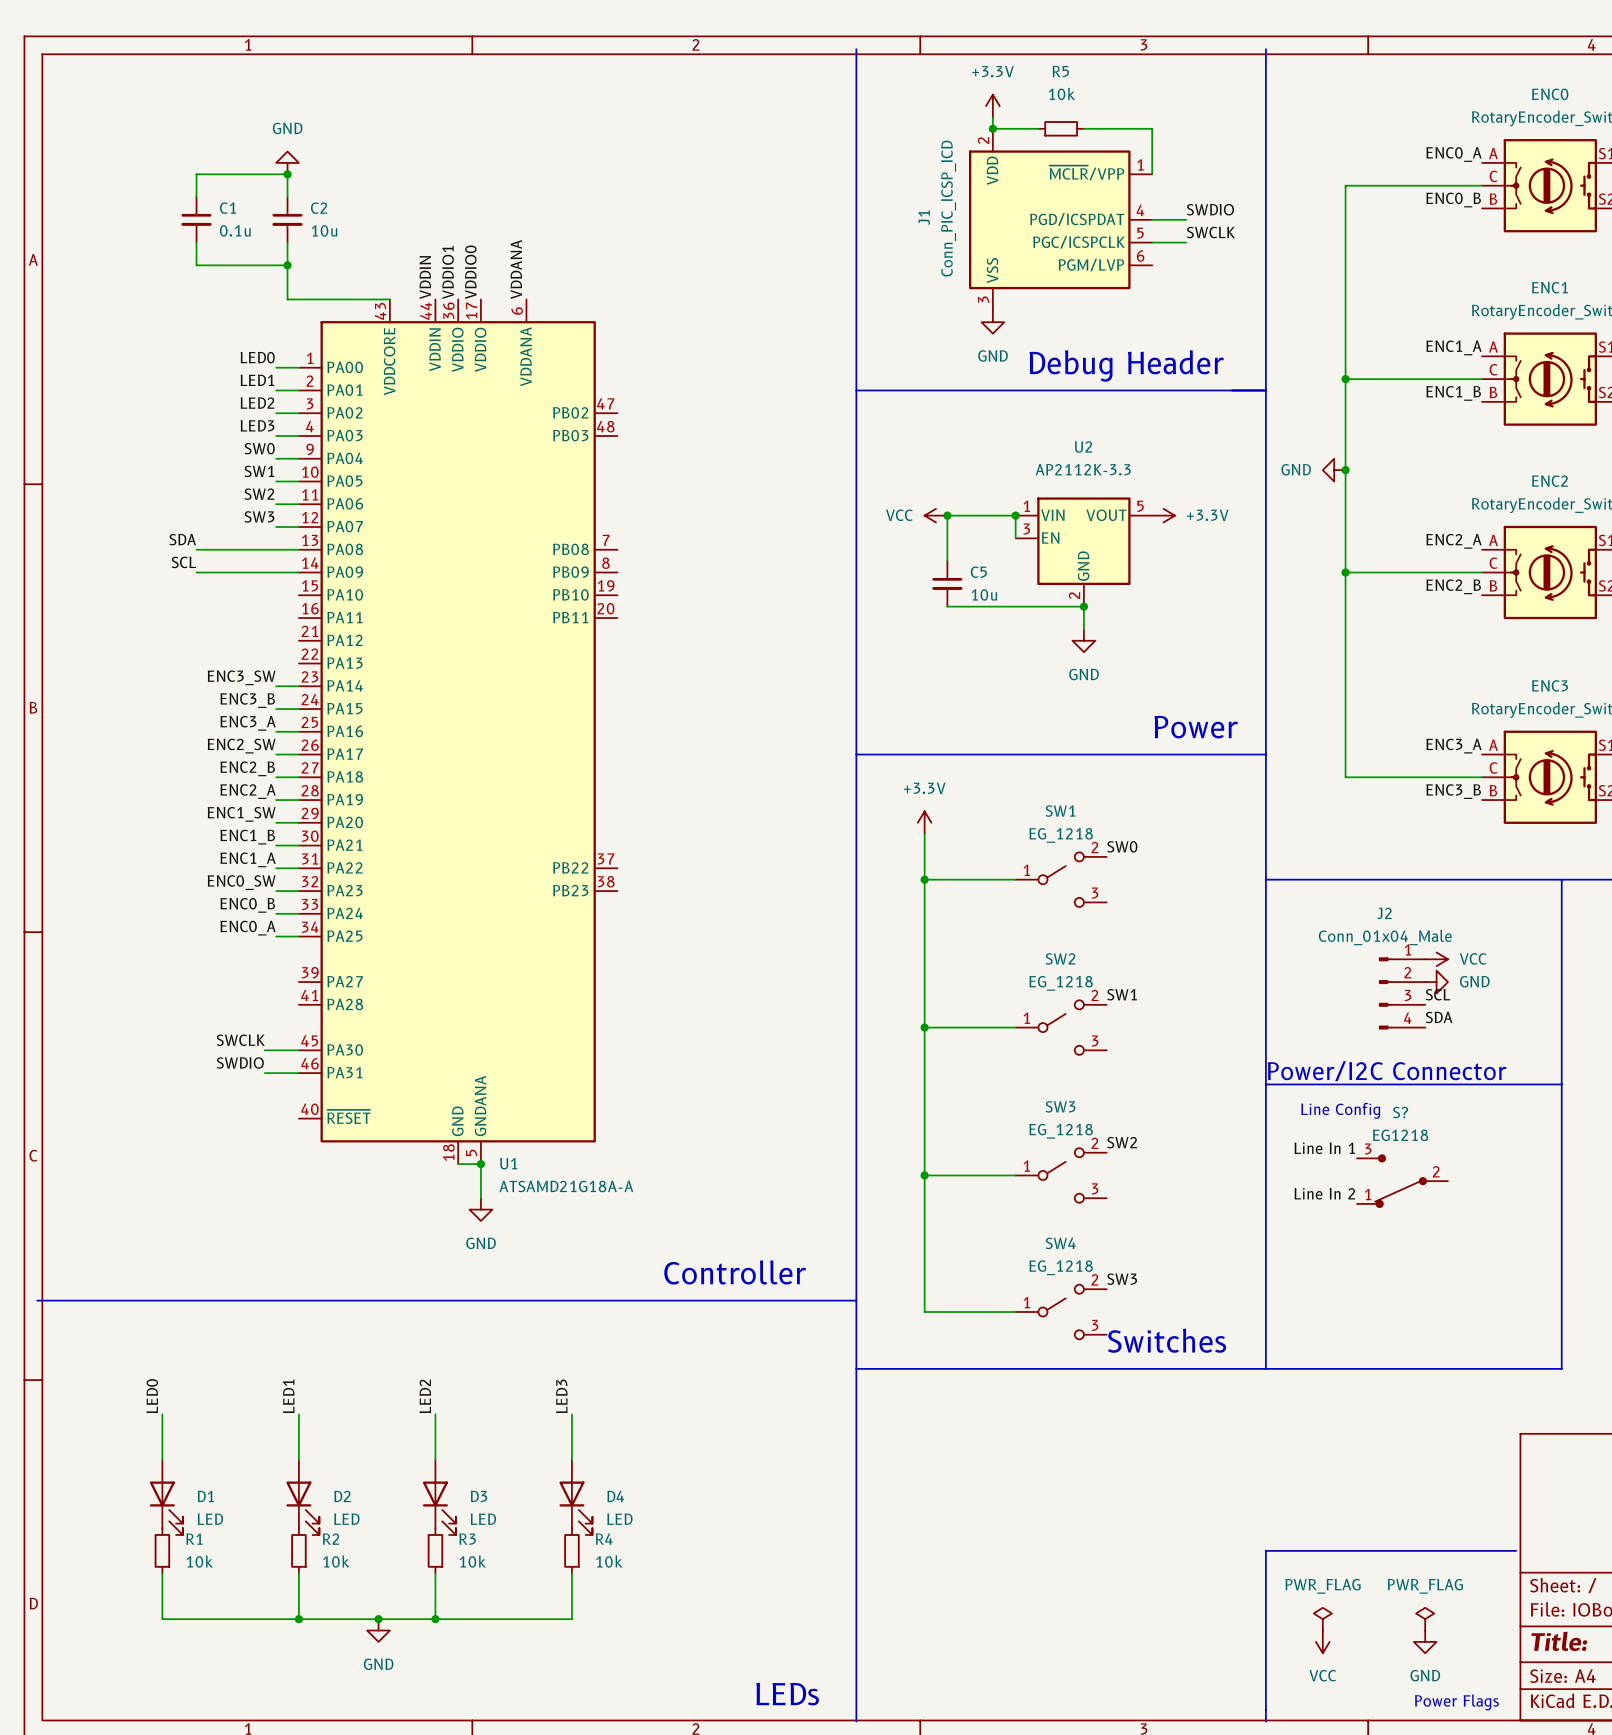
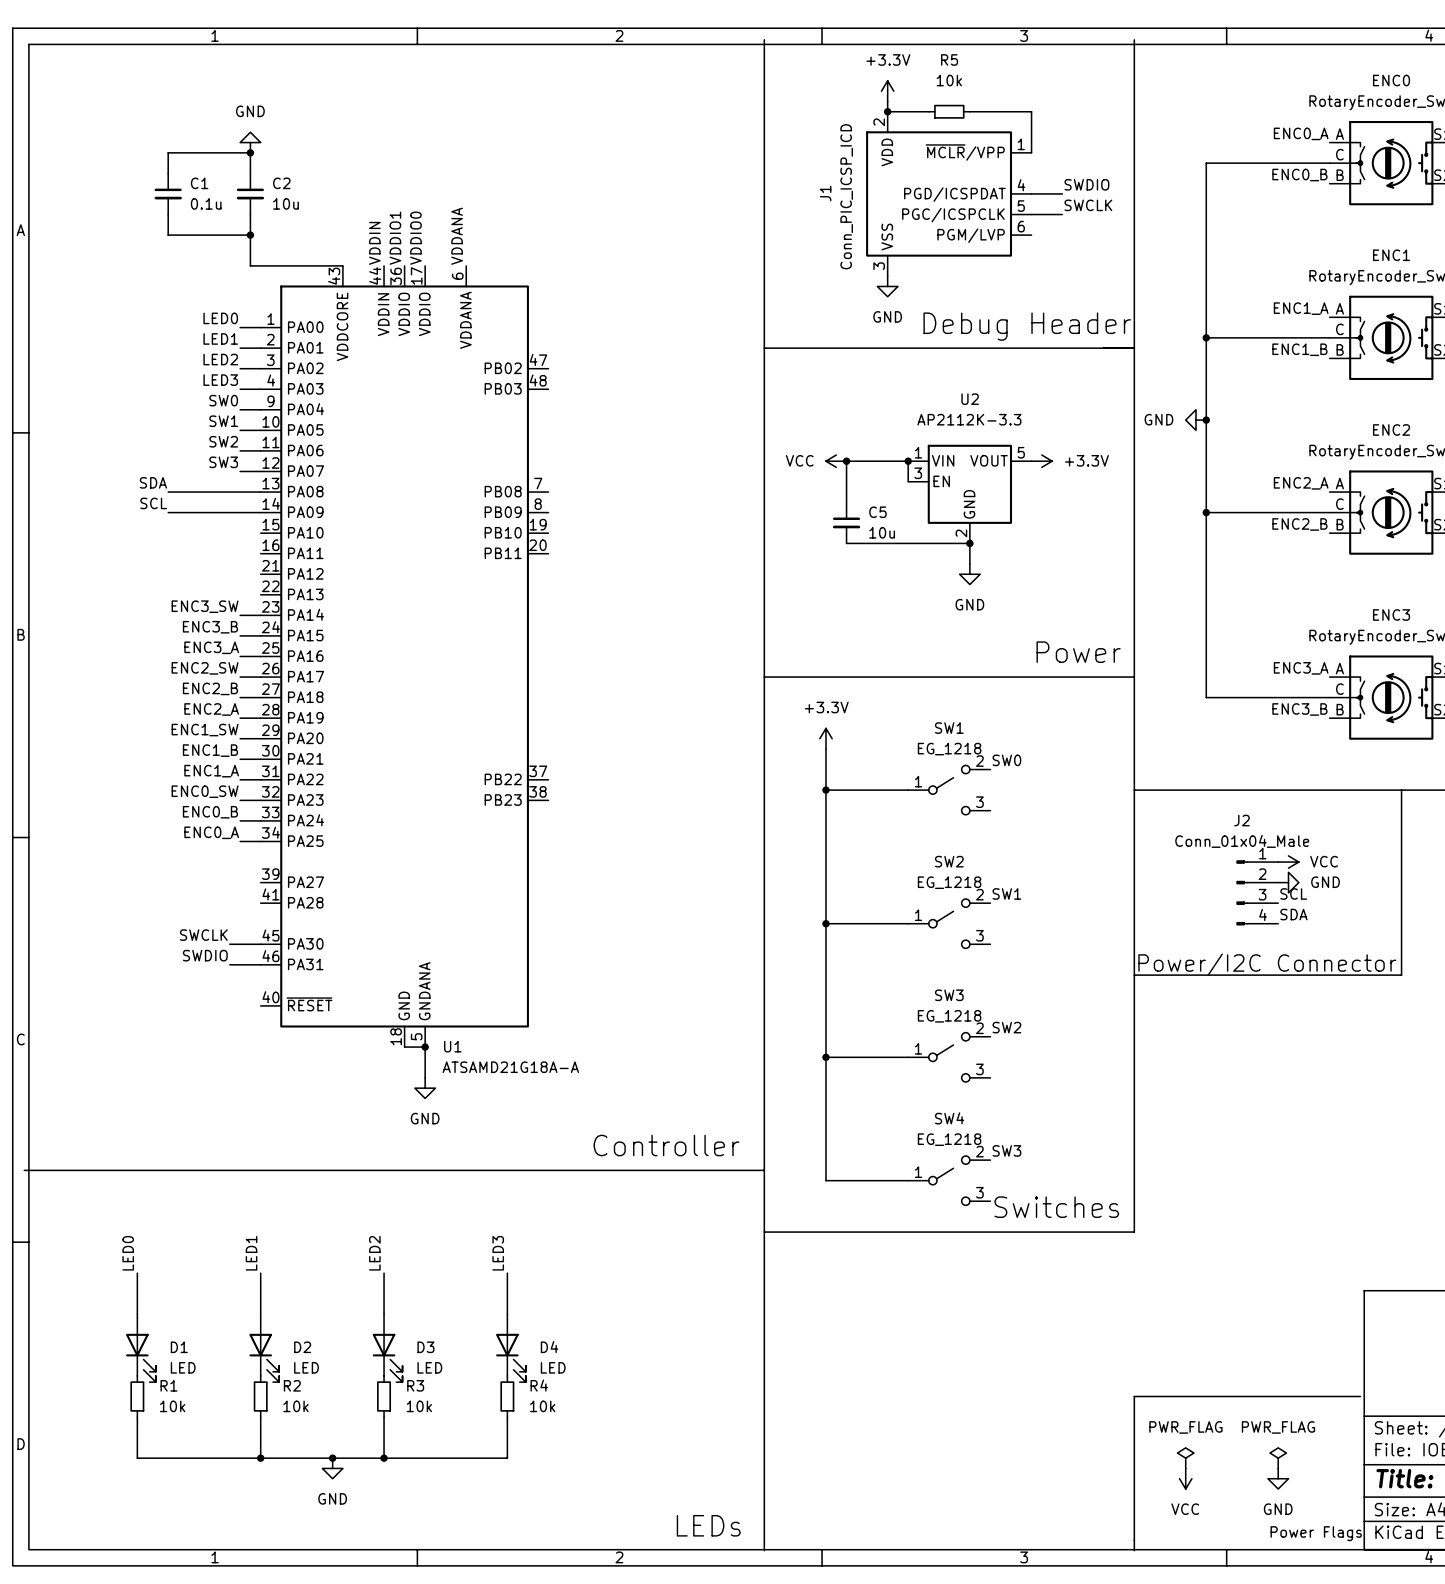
line: (1561, 1084) (1561, 1368) (1265, 1368) -> none
text: Line Config (1340, 1110) -> none
label: Line In 1 (1324, 1148) -> none
S?: EG1218 (1402, 1181) -> none
label: Line In 2 (1324, 1193) -> none

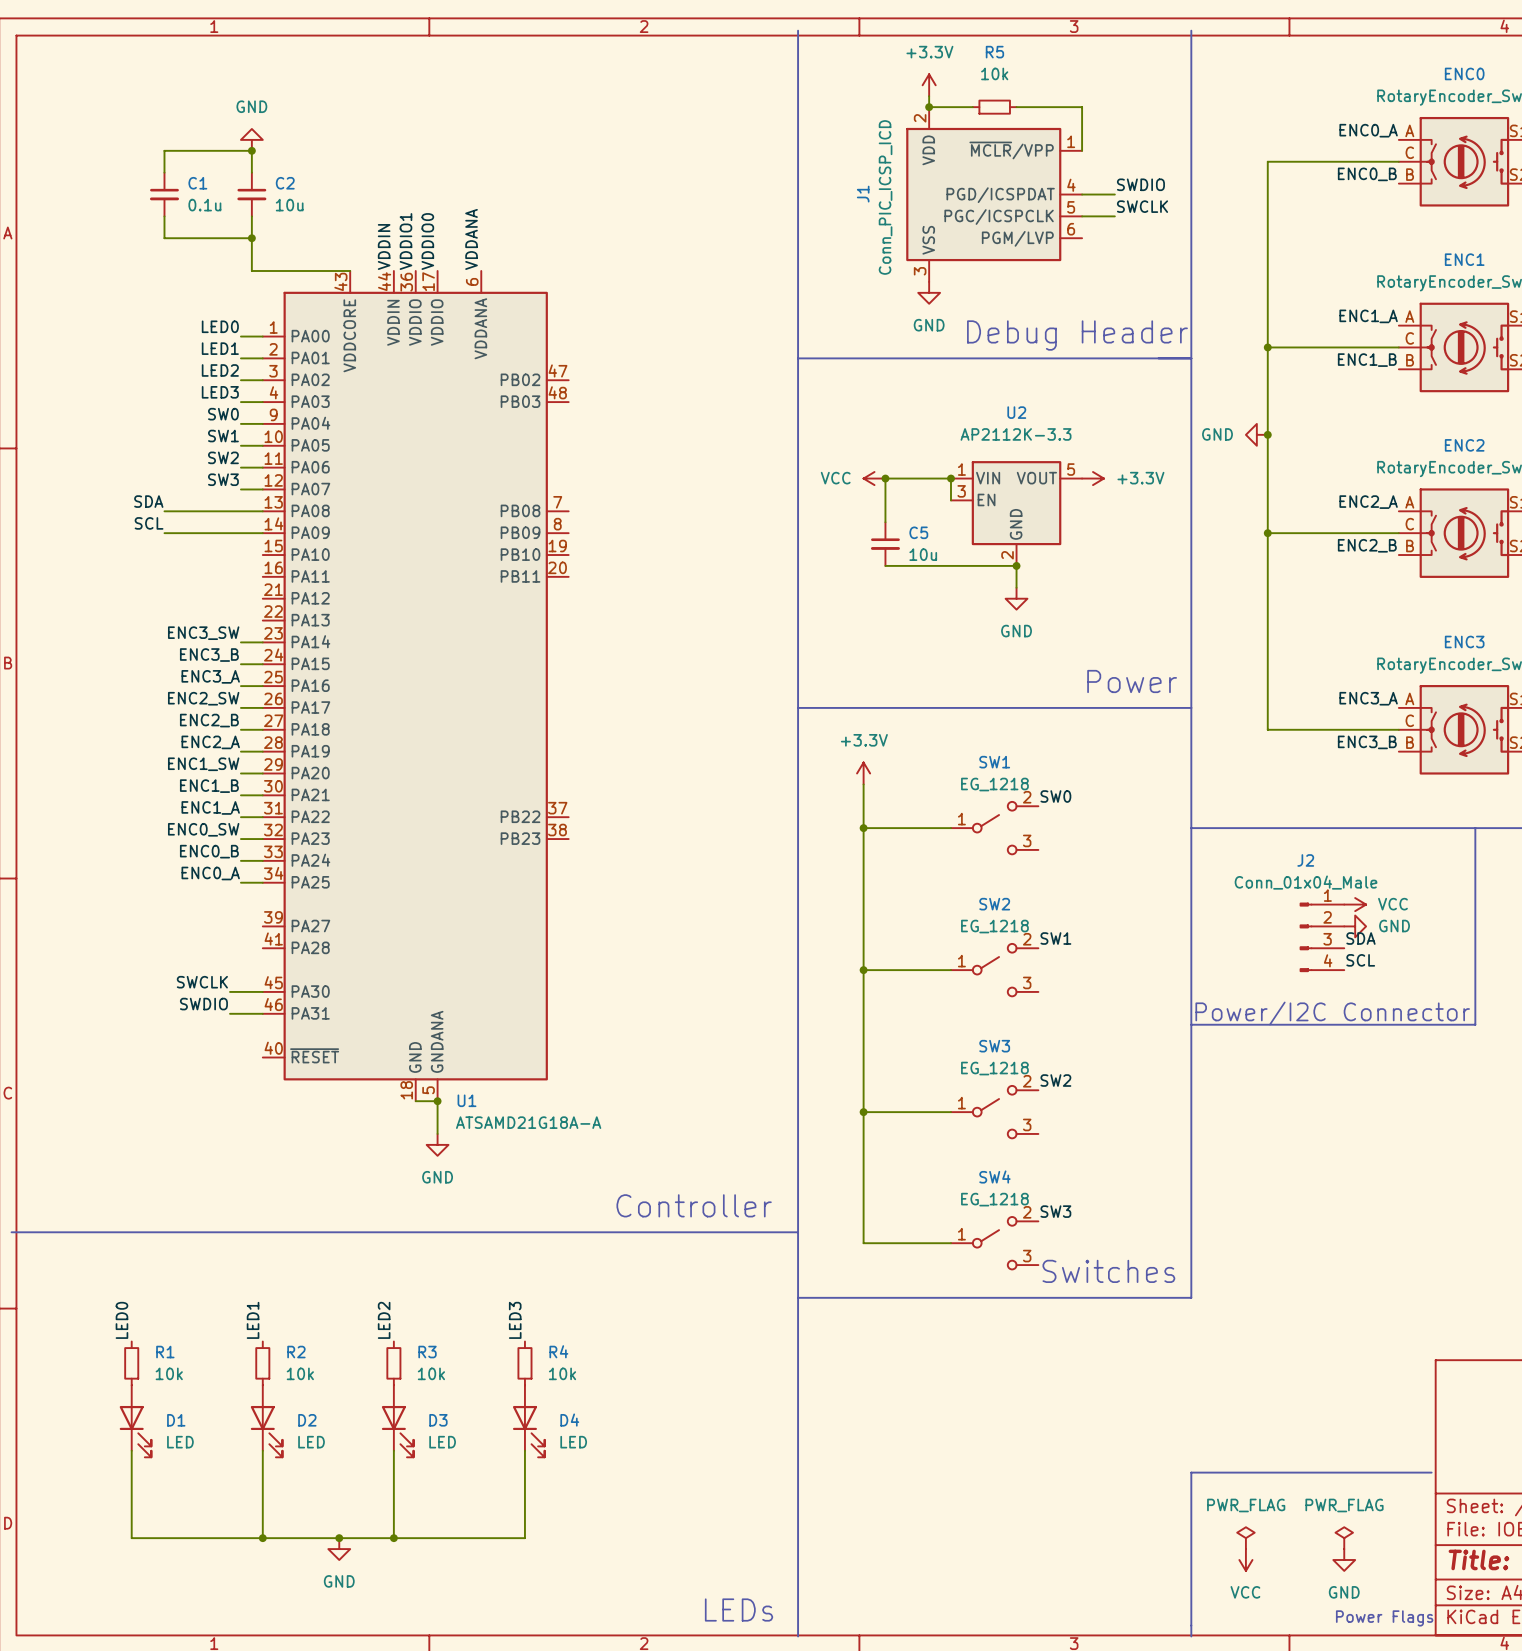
label: SCL (1293, 893) -> SDA (1360, 938)
label: SDA (1293, 914) -> SCL (1360, 960)
wire: (137, 1273) (137, 1314) -> (131, 1450) (131, 1494)
wire: (260, 1273) (260, 1314) -> (262, 1450) (262, 1494)
wire: (384, 1273) (384, 1314) -> (393, 1450) (393, 1494)
wire: (507, 1273) (507, 1314) -> (524, 1450) (524, 1494)
R1 position: (137, 1396) -> (131, 1363)
R2 position: (260, 1396) -> (262, 1363)
R3 position: (384, 1396) -> (393, 1363)
R4 position: (507, 1396) -> (524, 1363)

